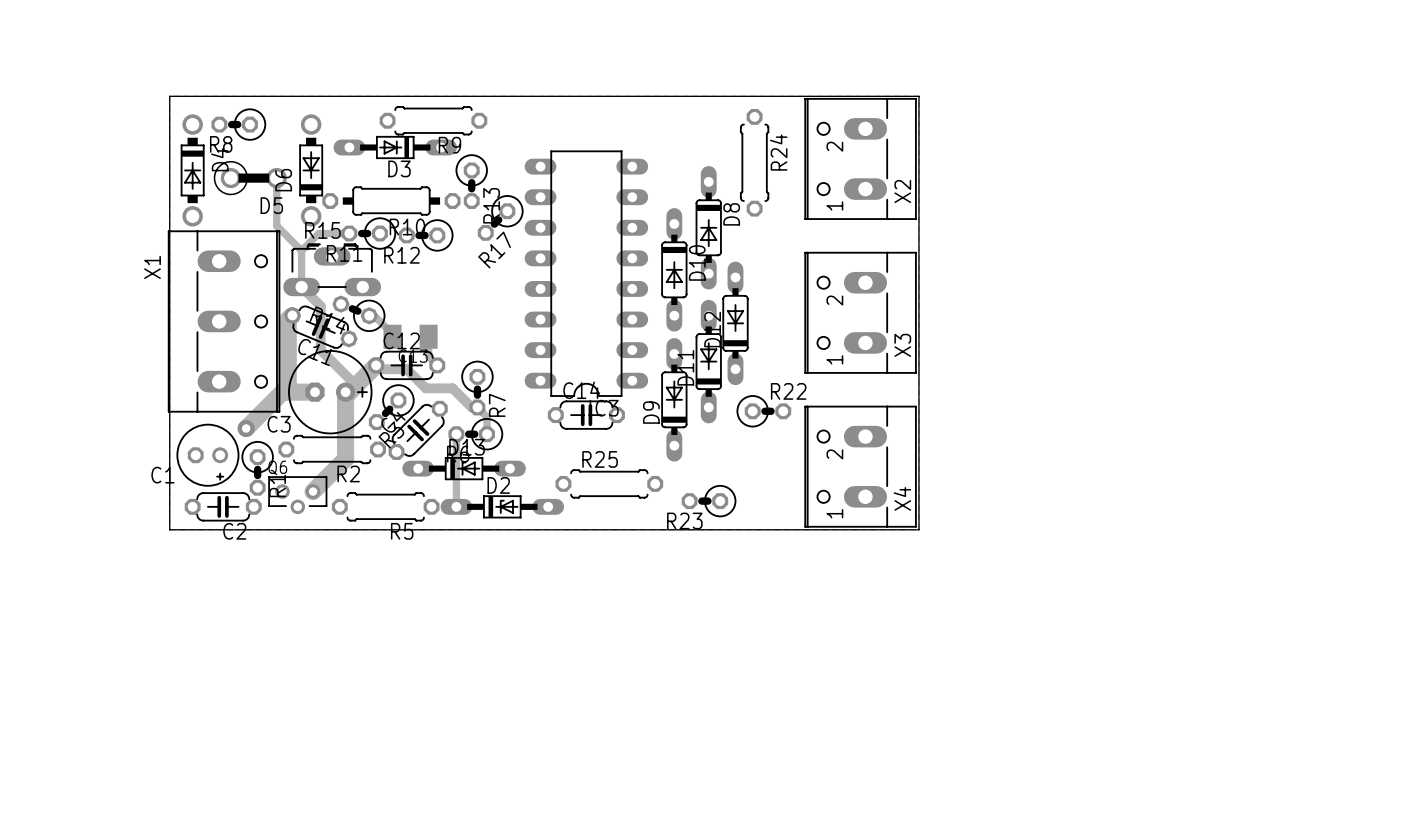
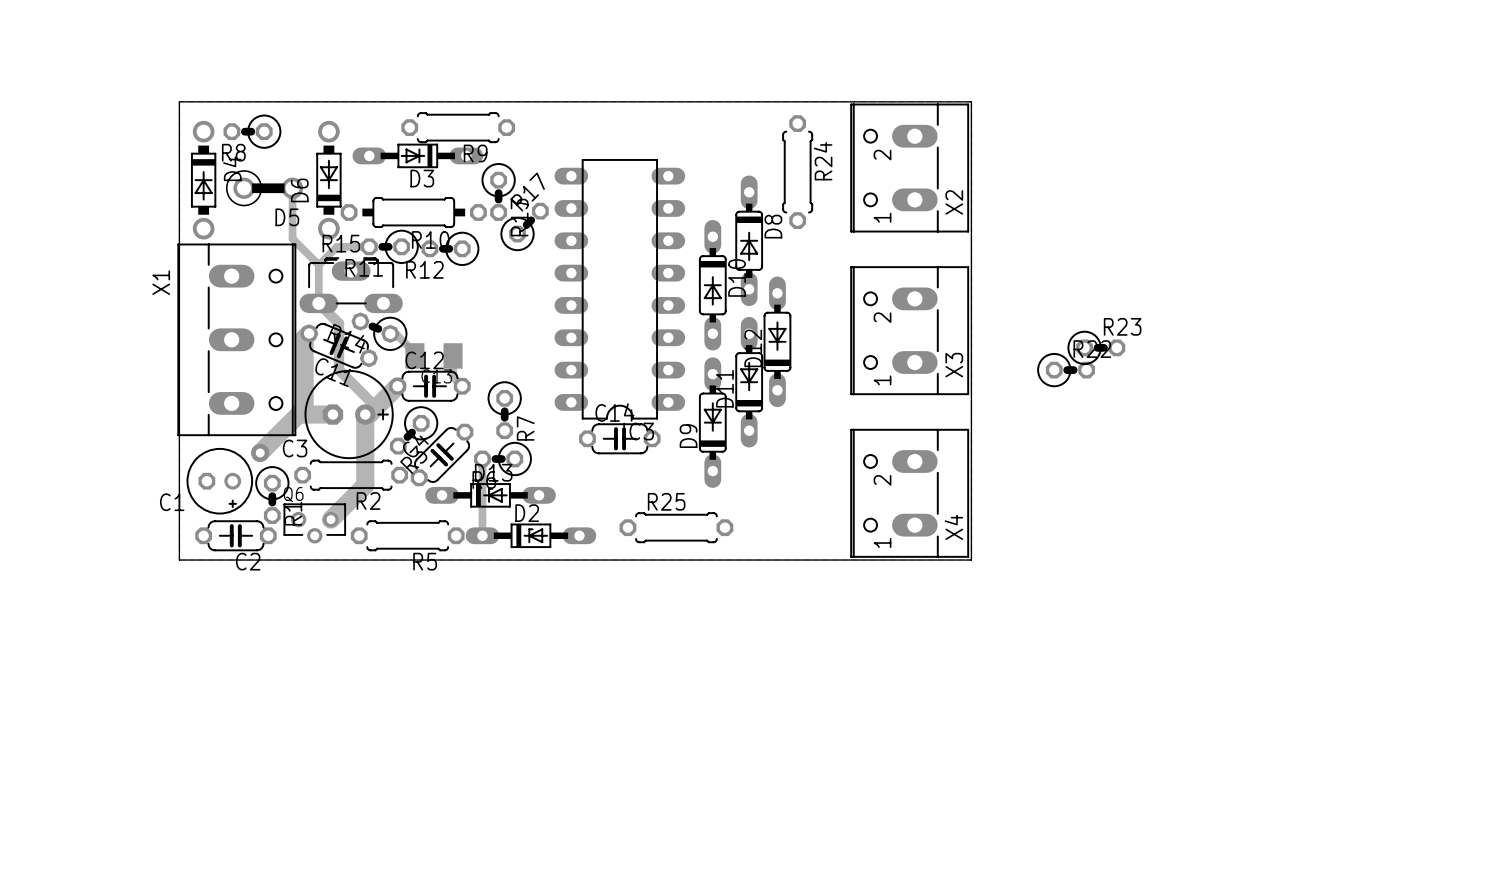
R17 rotation: 0° (500, 217) -> 180° (524, 226)
track: (376, 365) (379, 369) (406, 369) (425, 388) (452, 388) (471, 407) (477, 407) (487, 417) (487, 434) -> none
R22 position: (763, 411) -> (1066, 370)
R25 position: (609, 483) -> (676, 527)
R23 rotation: 0° (709, 501) -> 180° (1096, 347)
R23 position: (709, 501) -> (1096, 347)

